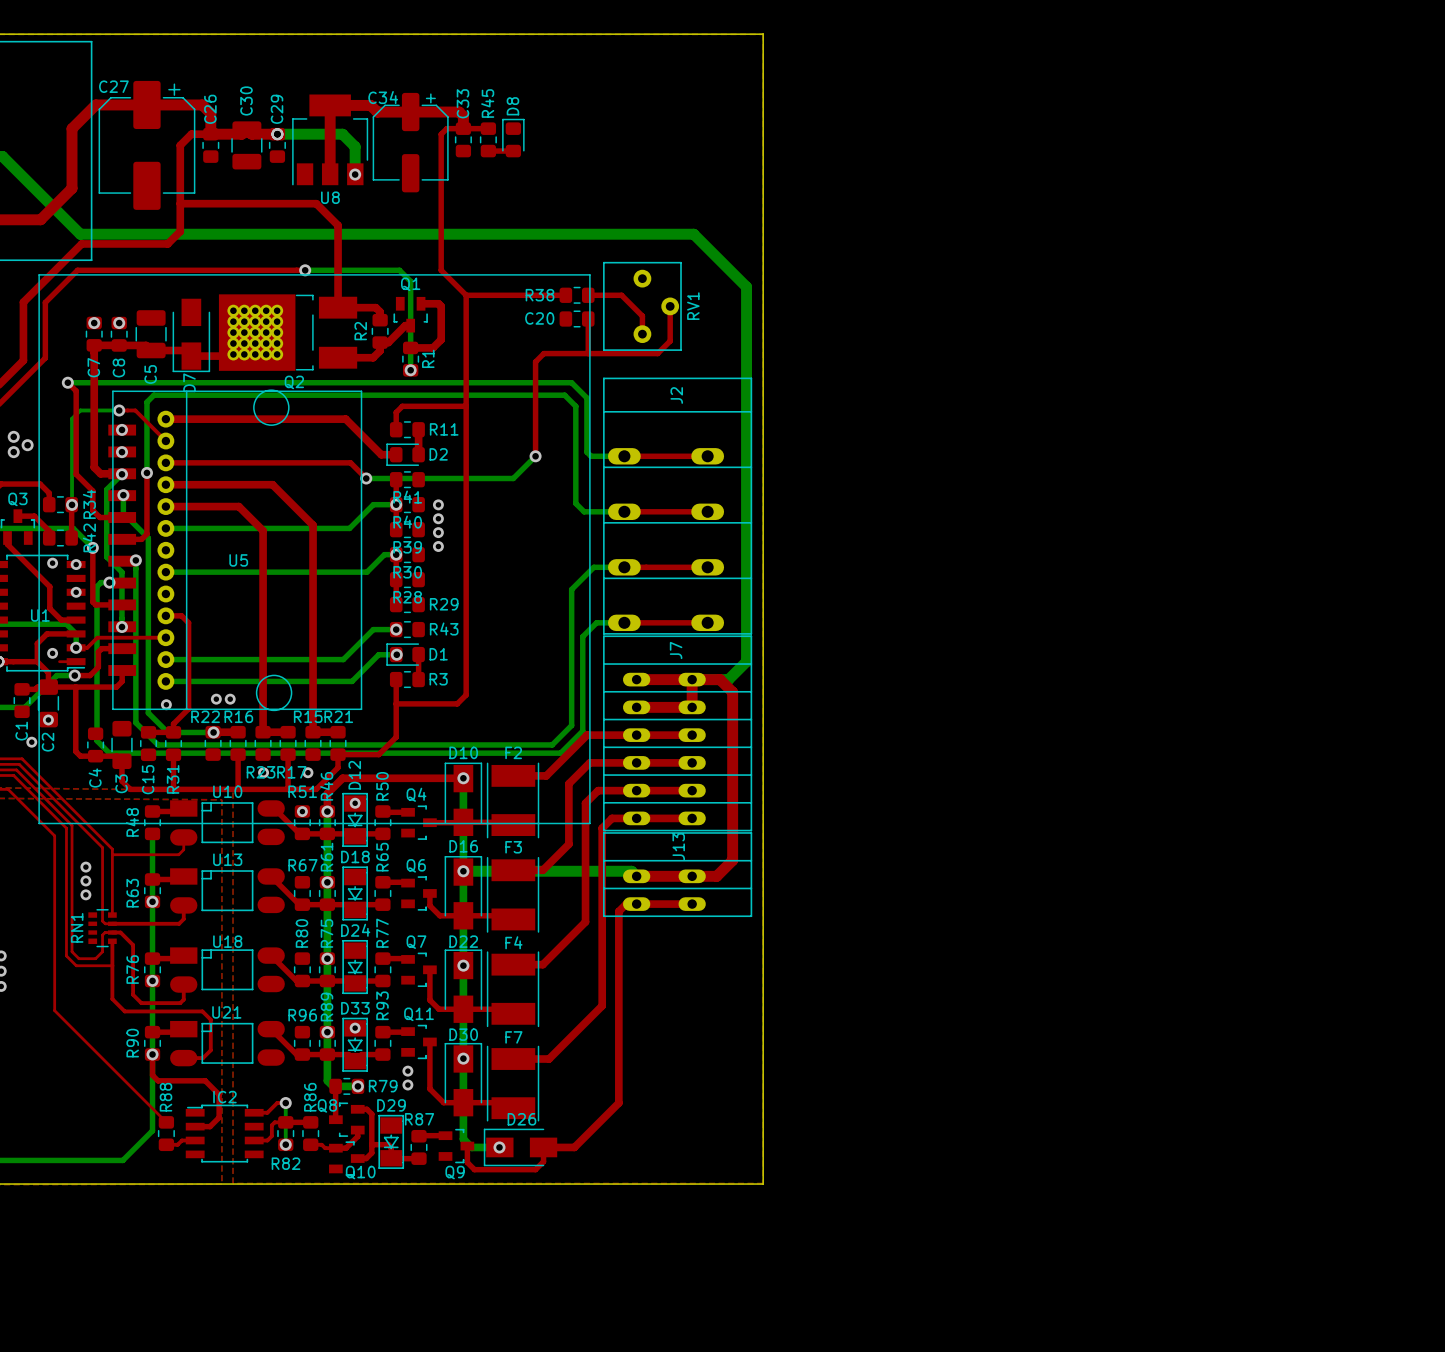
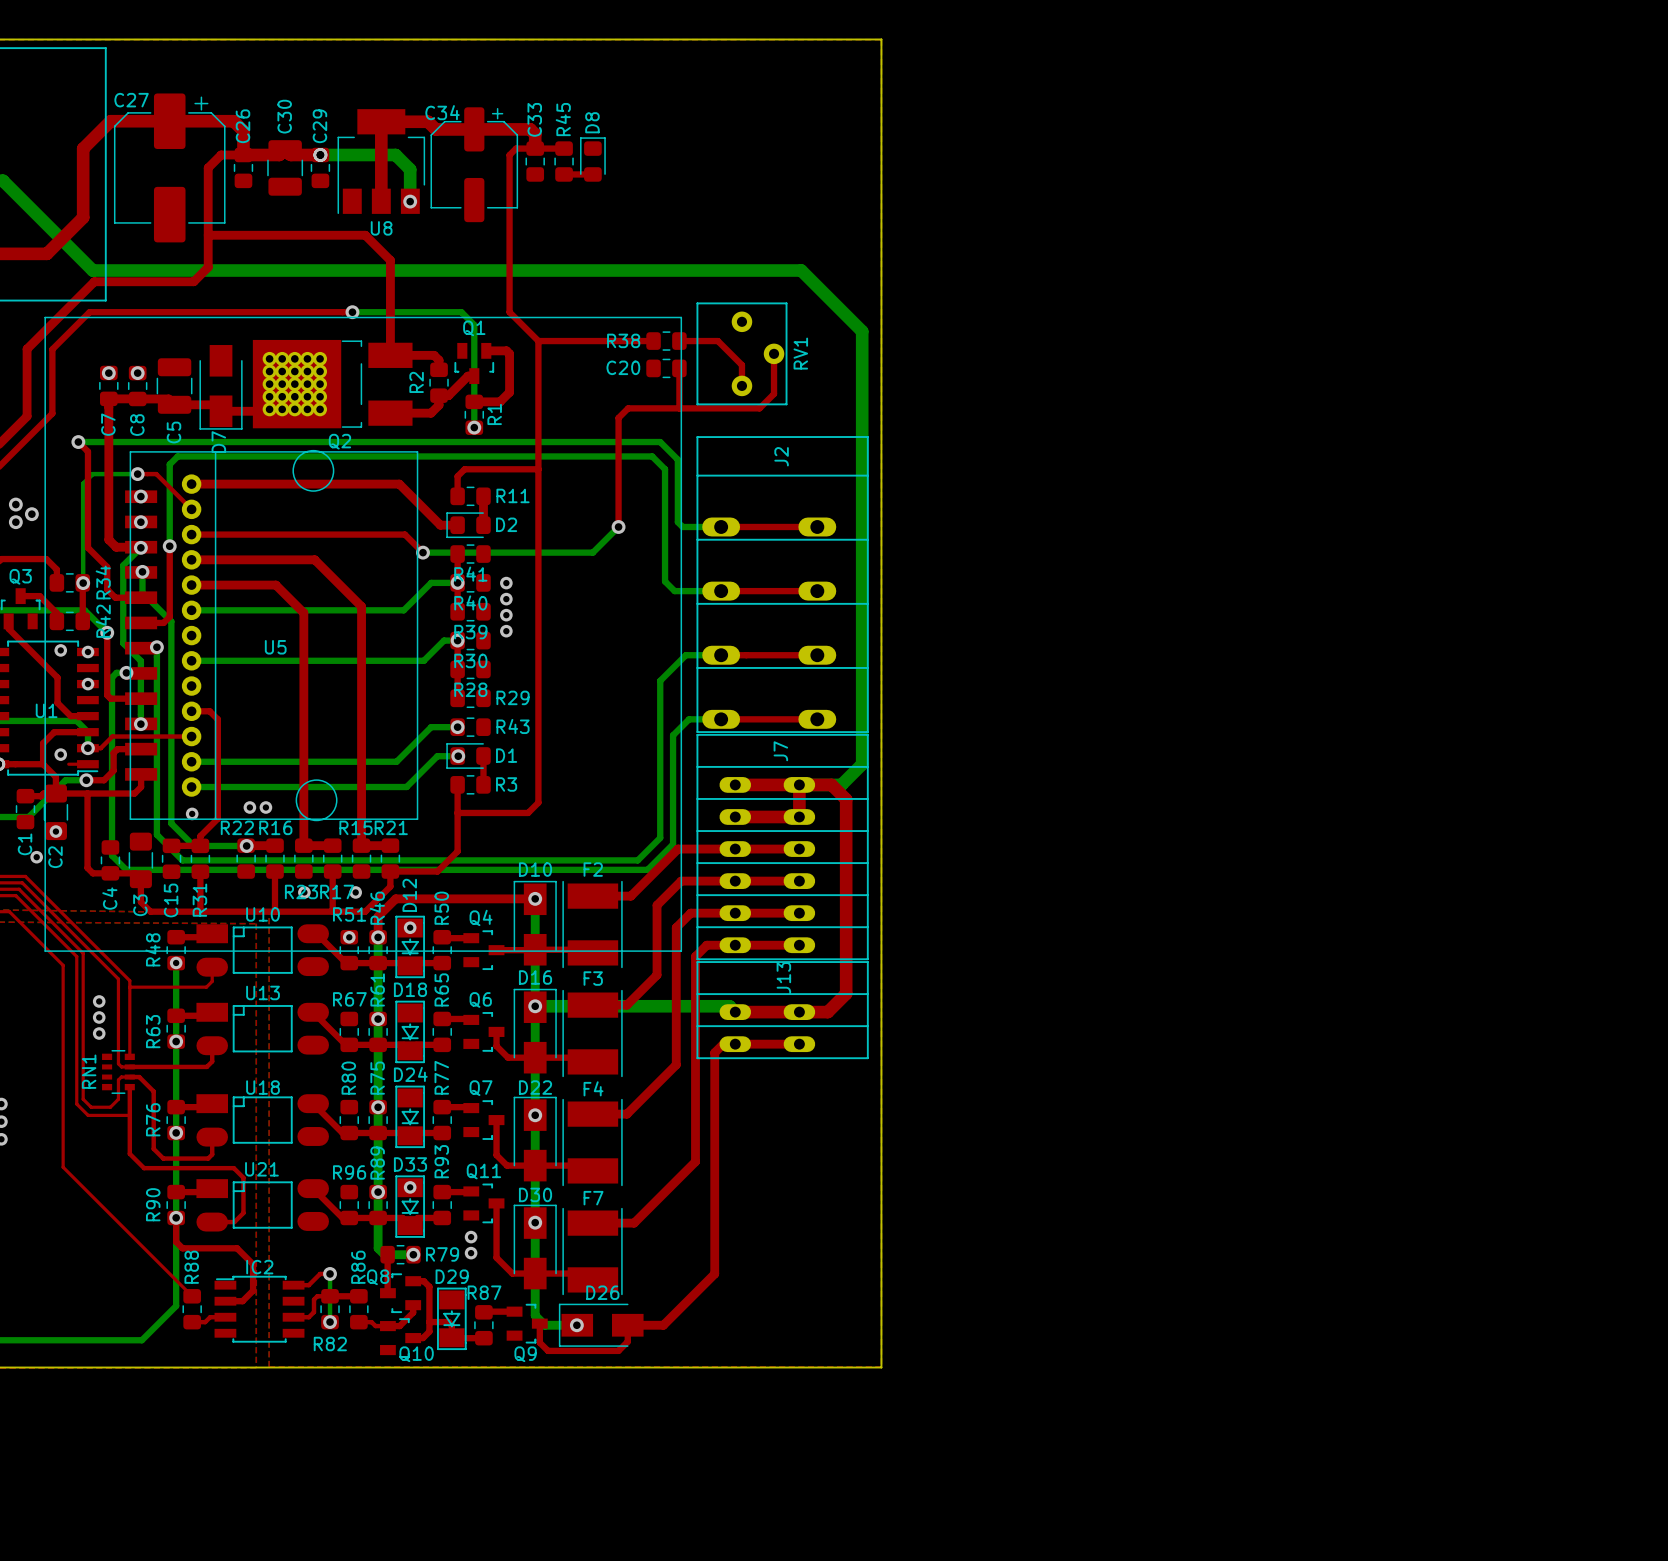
via: none -> (176, 962)

